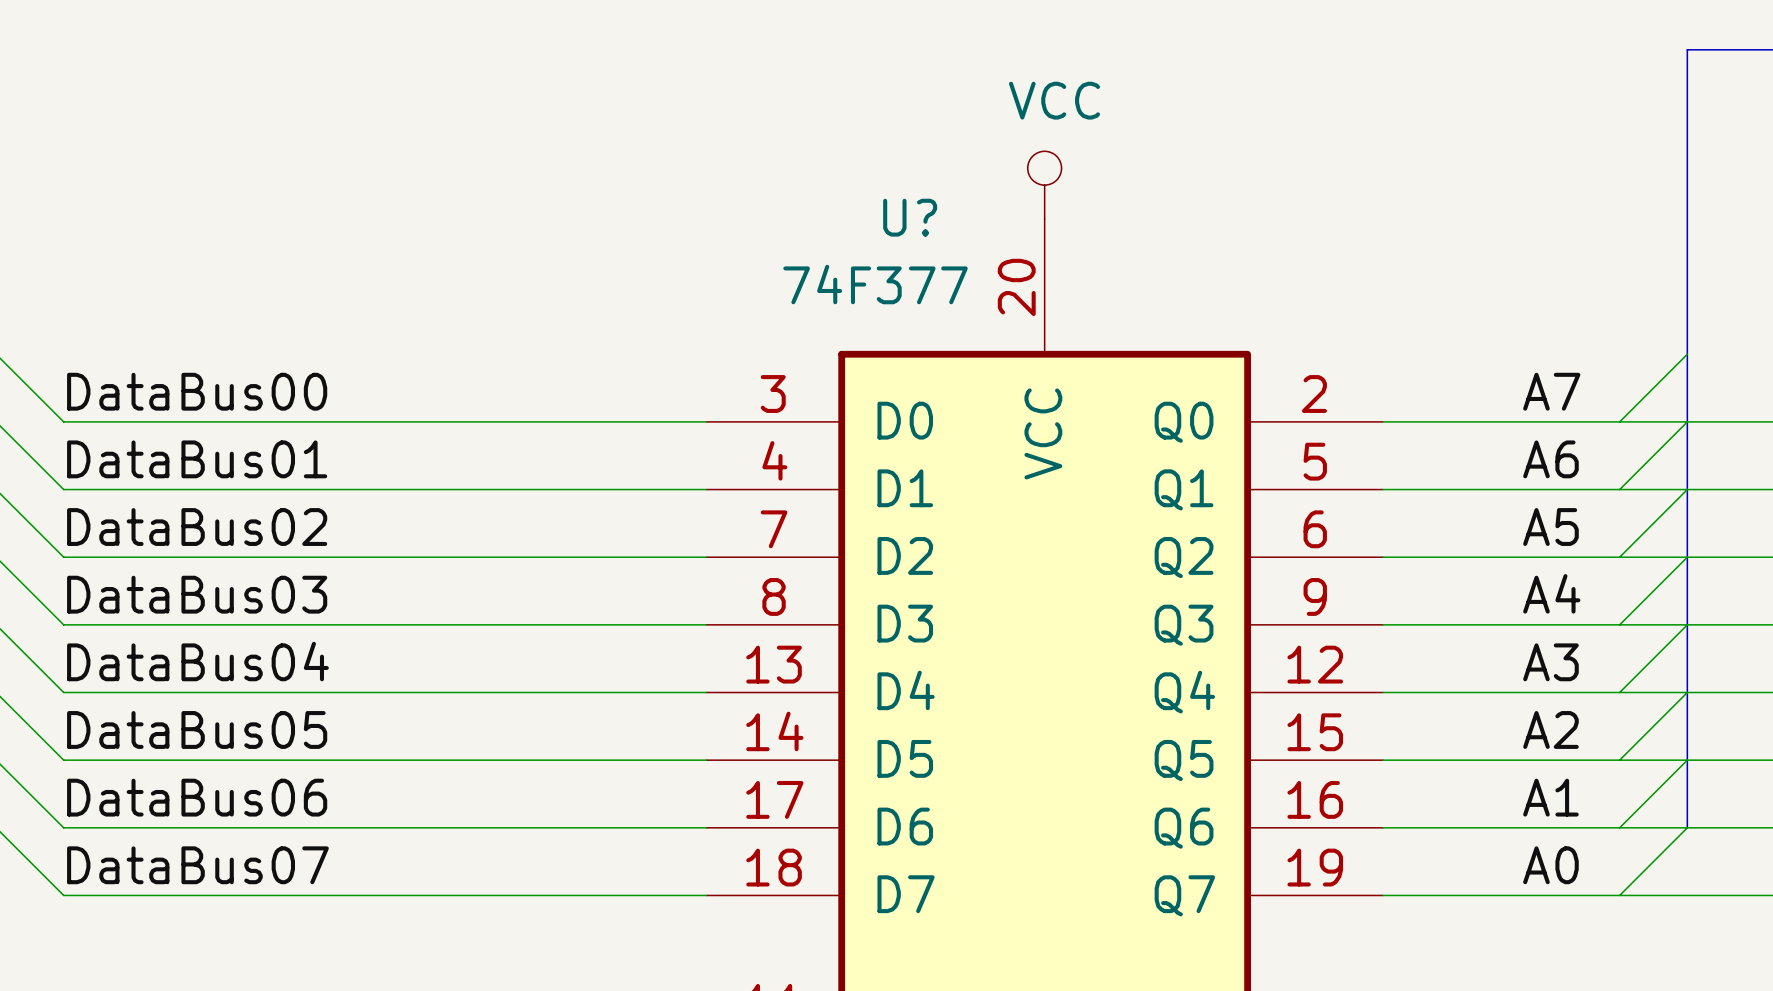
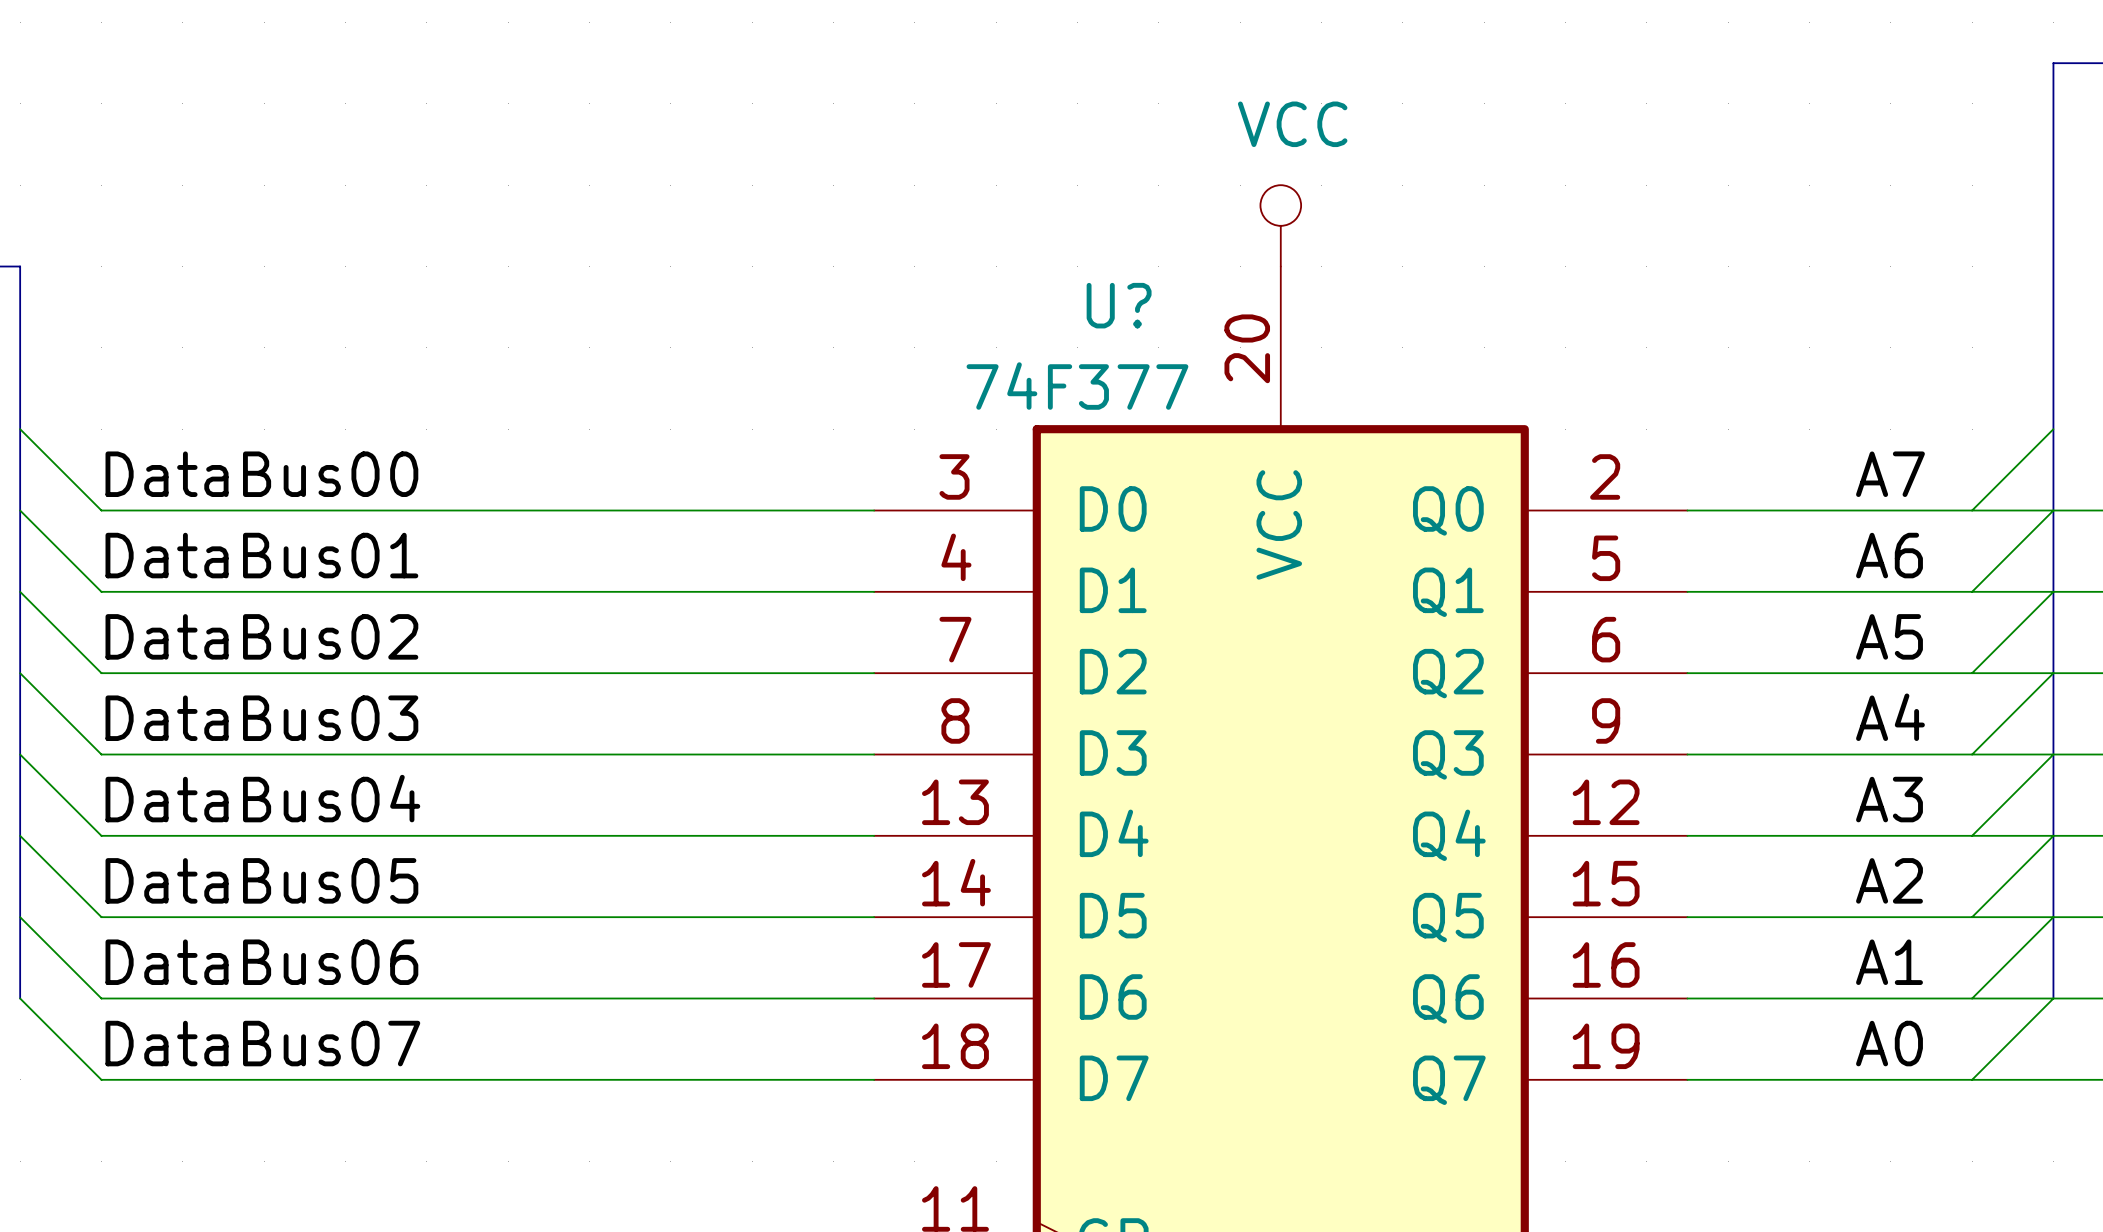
U? name position: U? (910, 217) -> U? (1119, 305)
U? value position: 74F377 (875, 284) -> 74F377 (1077, 386)

